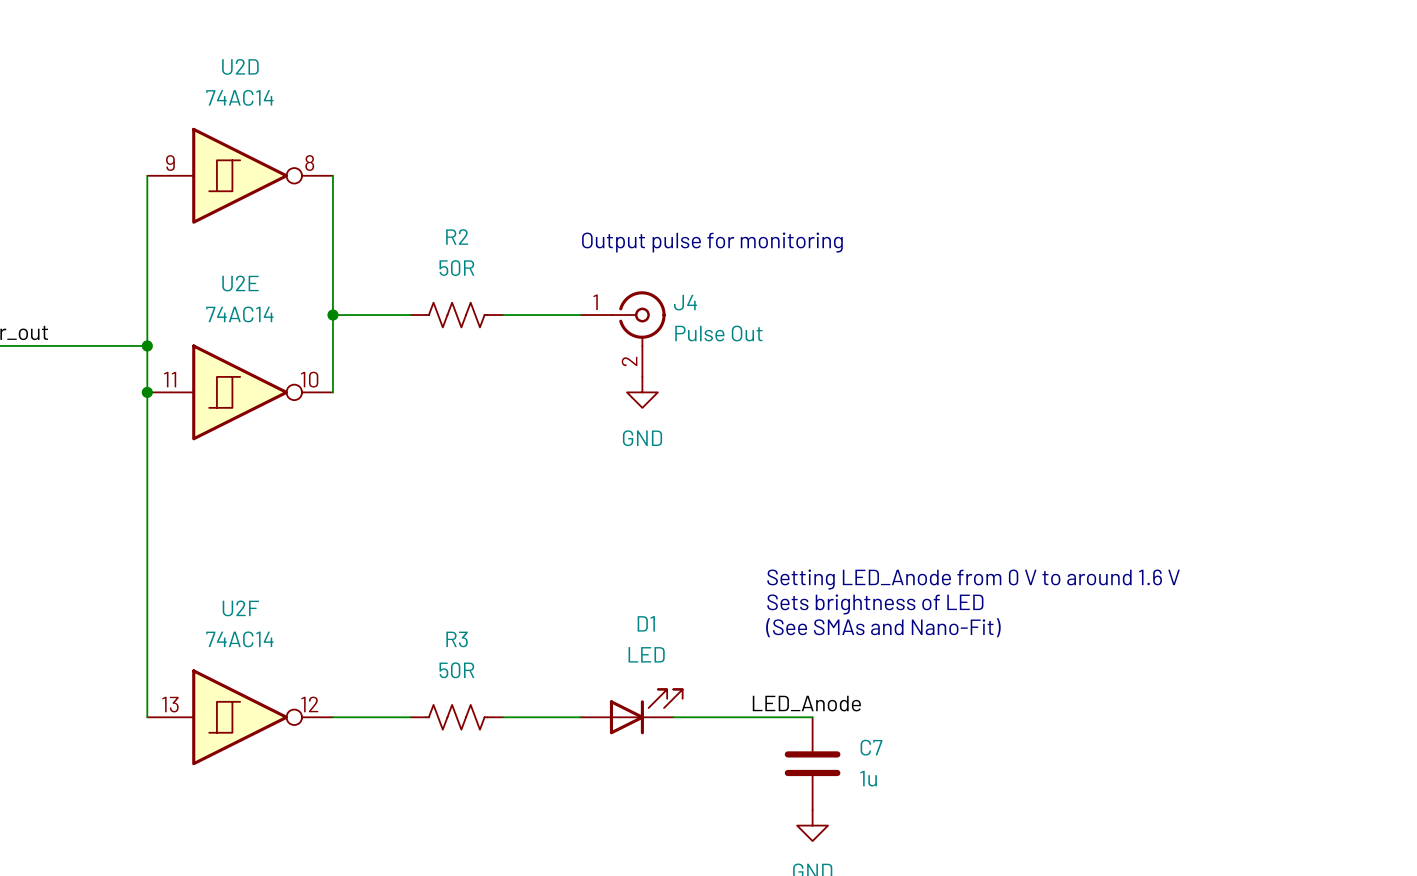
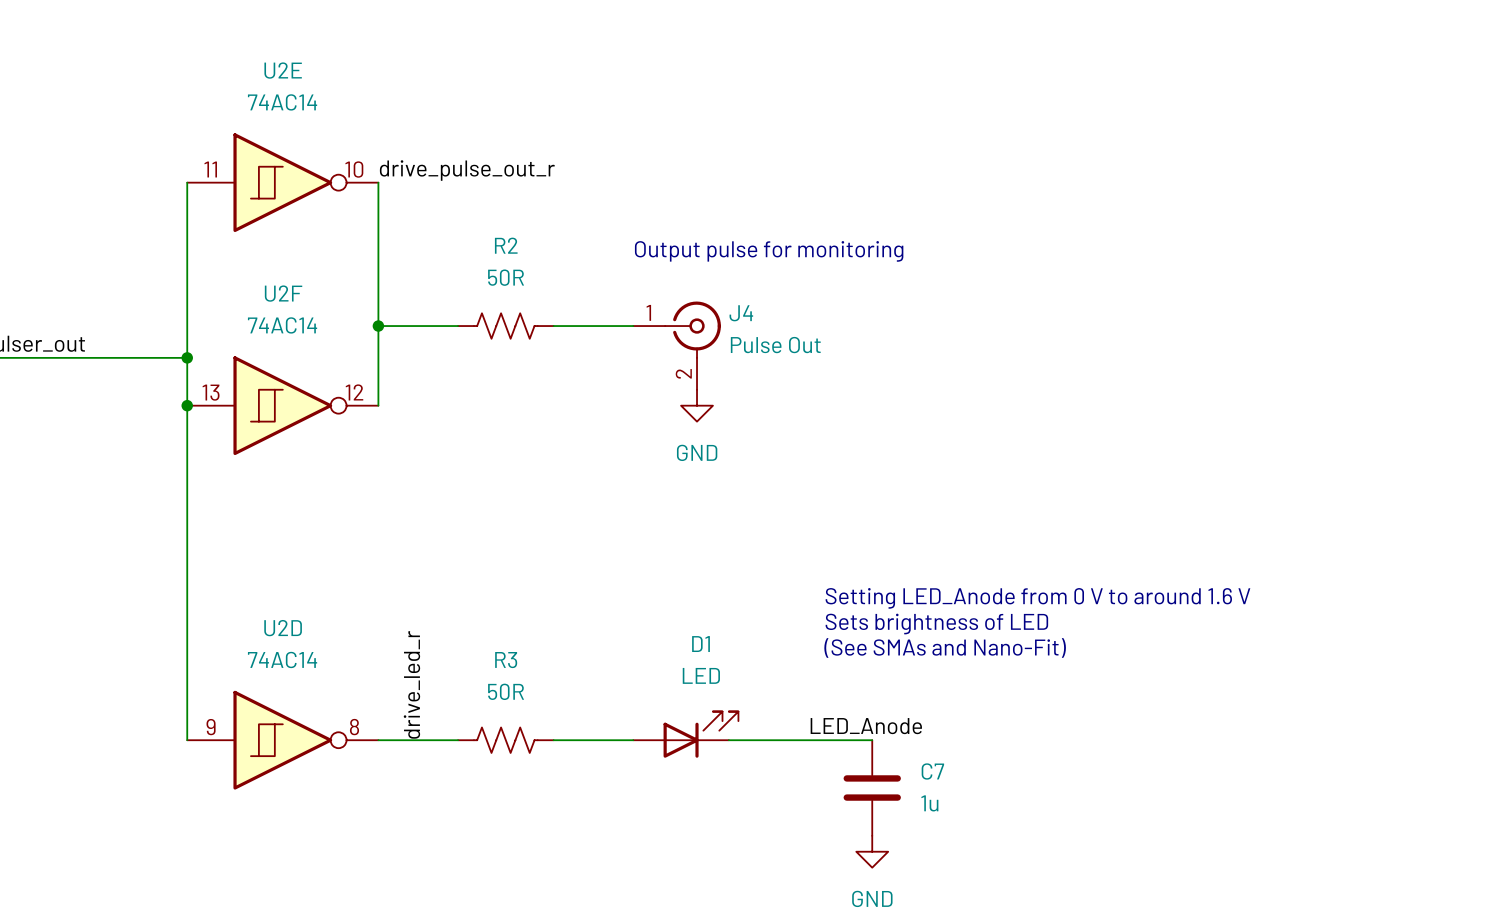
label: none -> drive_pulse_out_r (467, 170)
U2D position: (240, 175) -> (282, 740)
U2E position: (240, 392) -> (282, 182)
label: none -> drive_led_r (411, 684)
U2F position: (240, 717) -> (282, 405)

